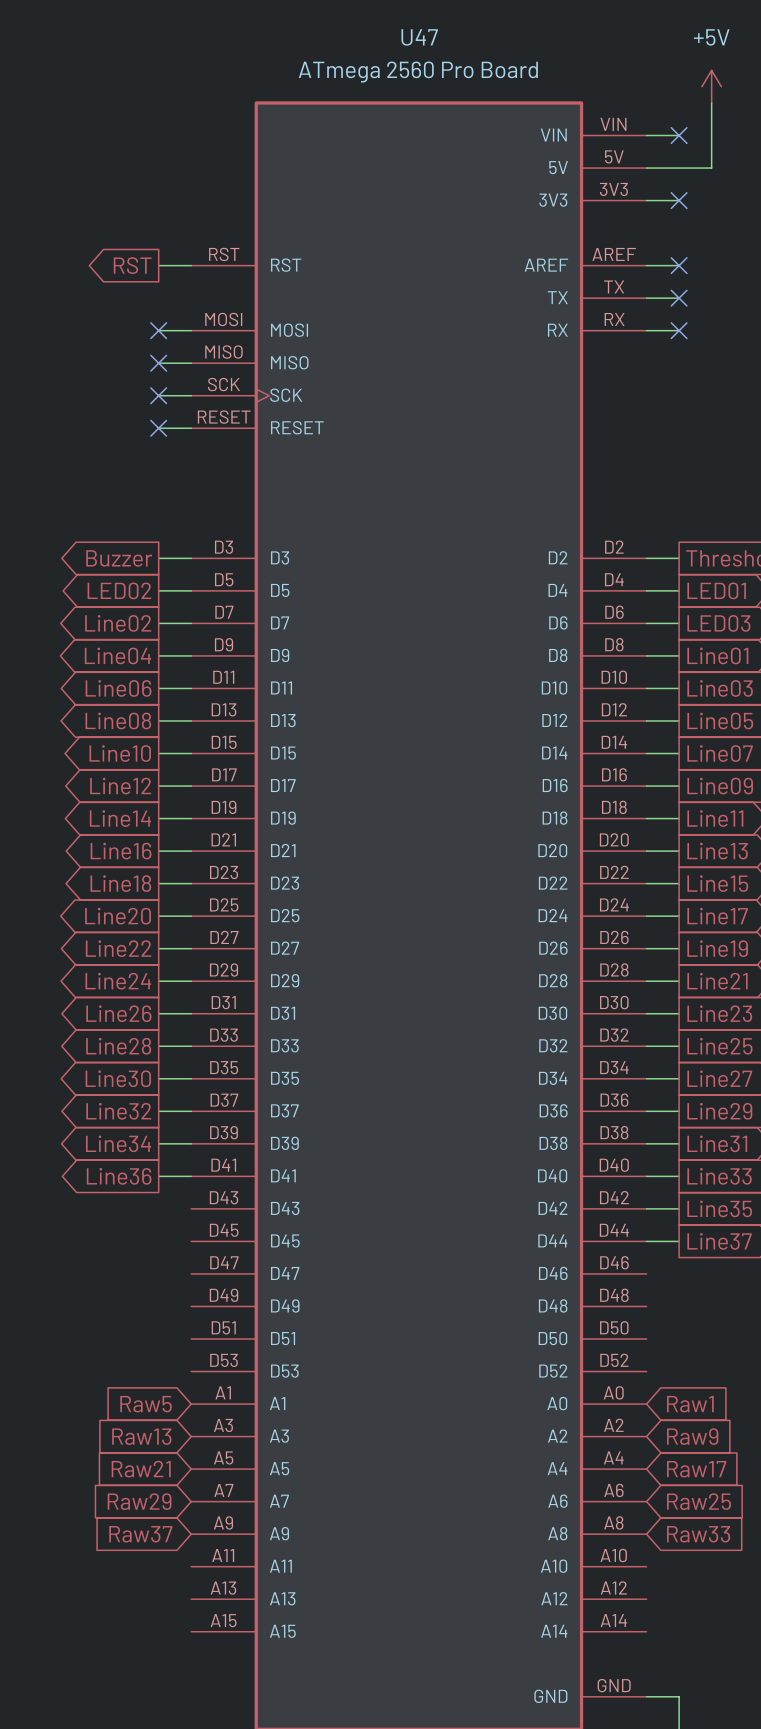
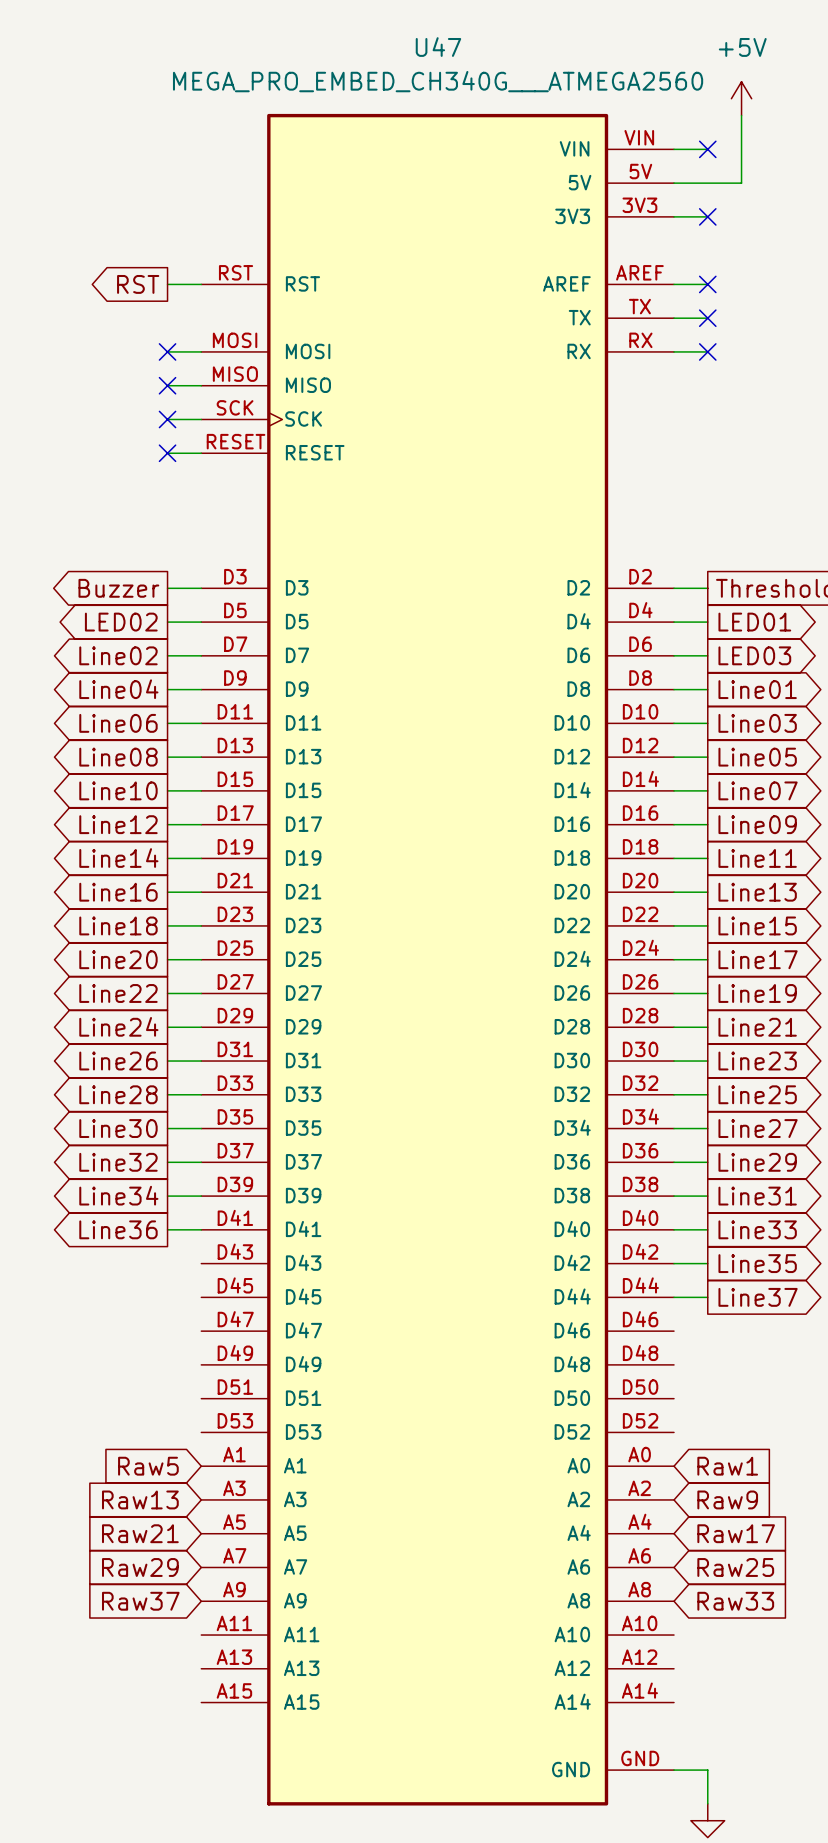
U47 value: ATmega 2560 Pro Board (418, 72) -> MEGA_PRO_EMBED_CH340G___ATMEGA2560 (438, 81)

